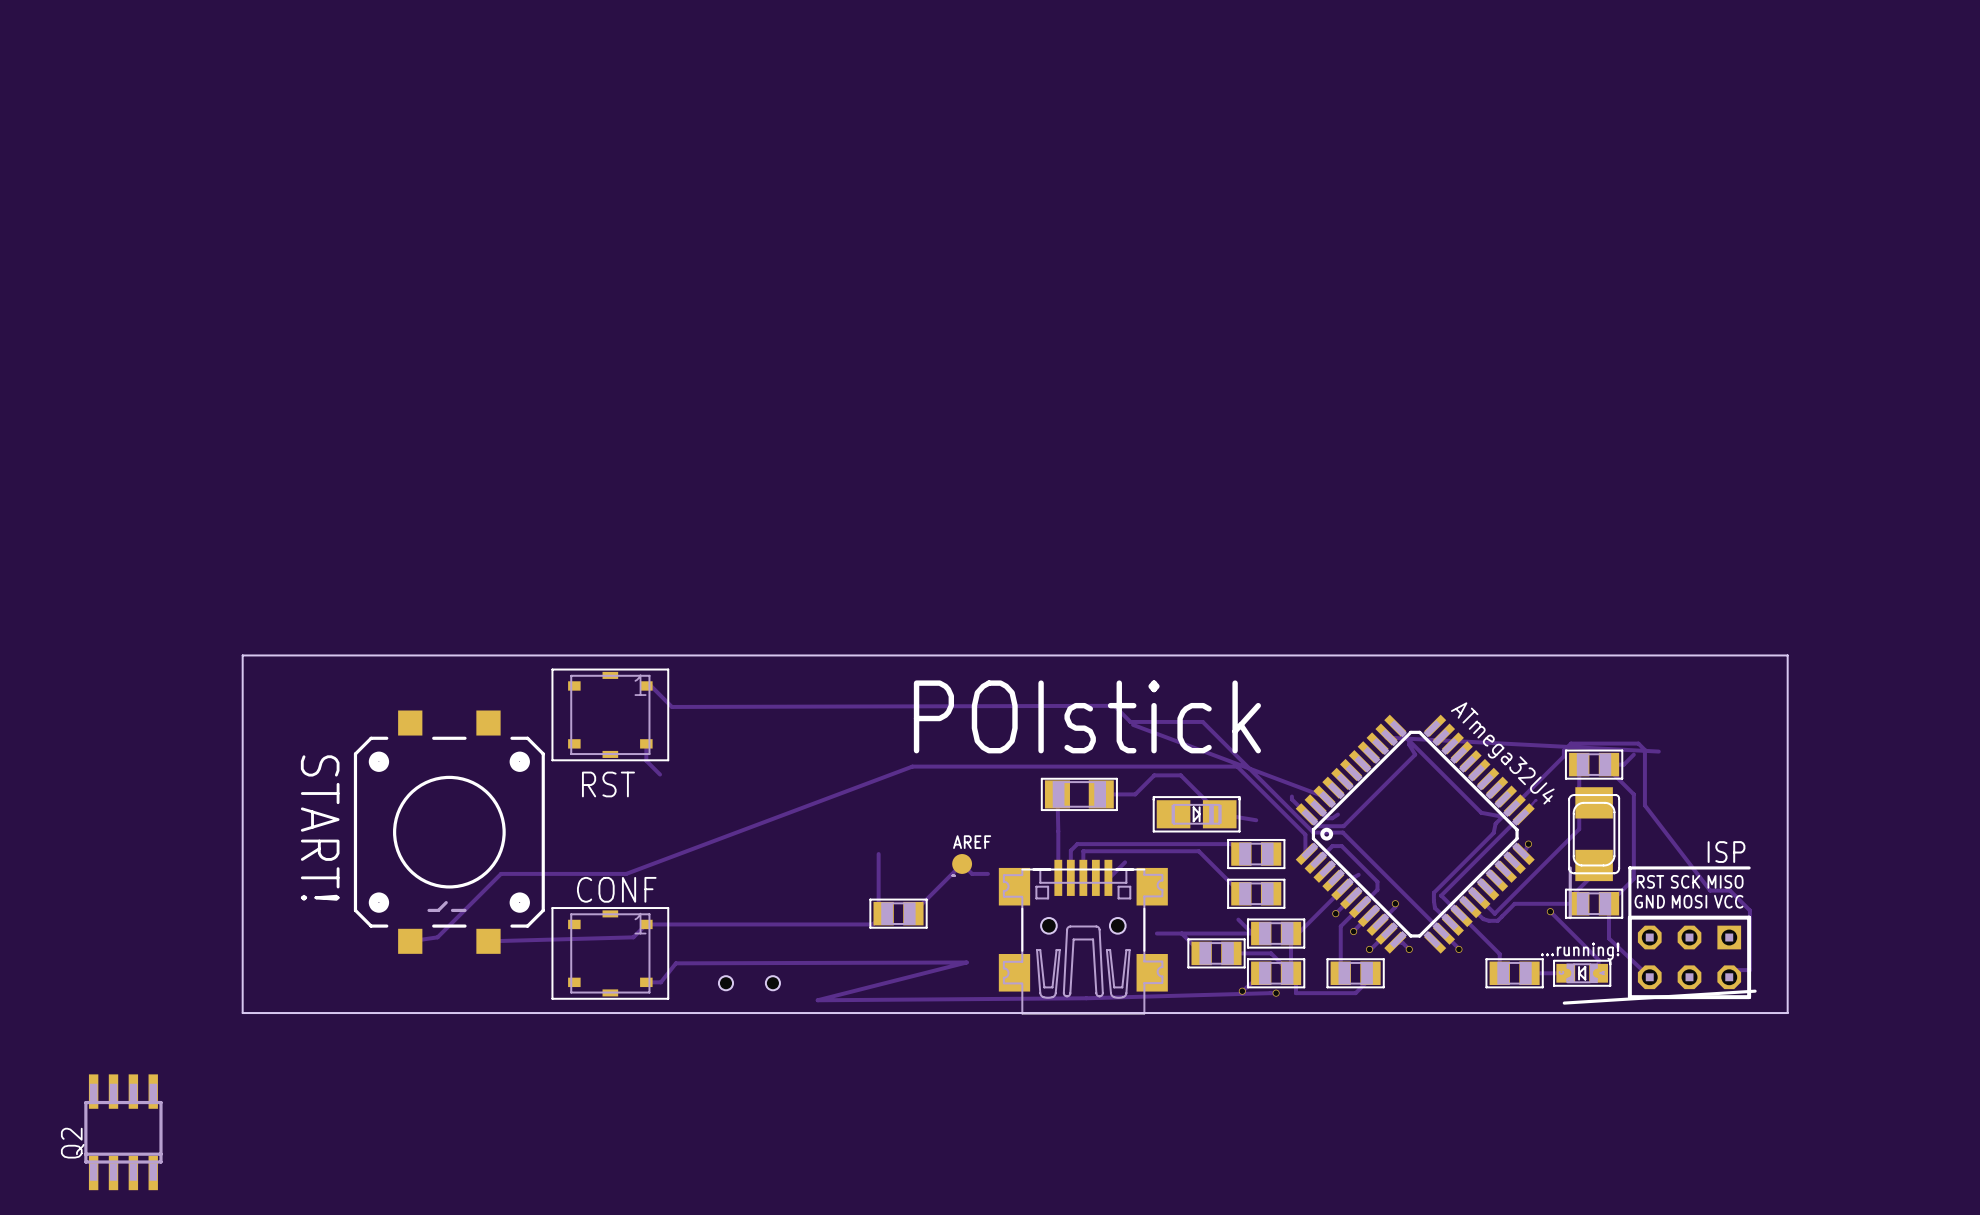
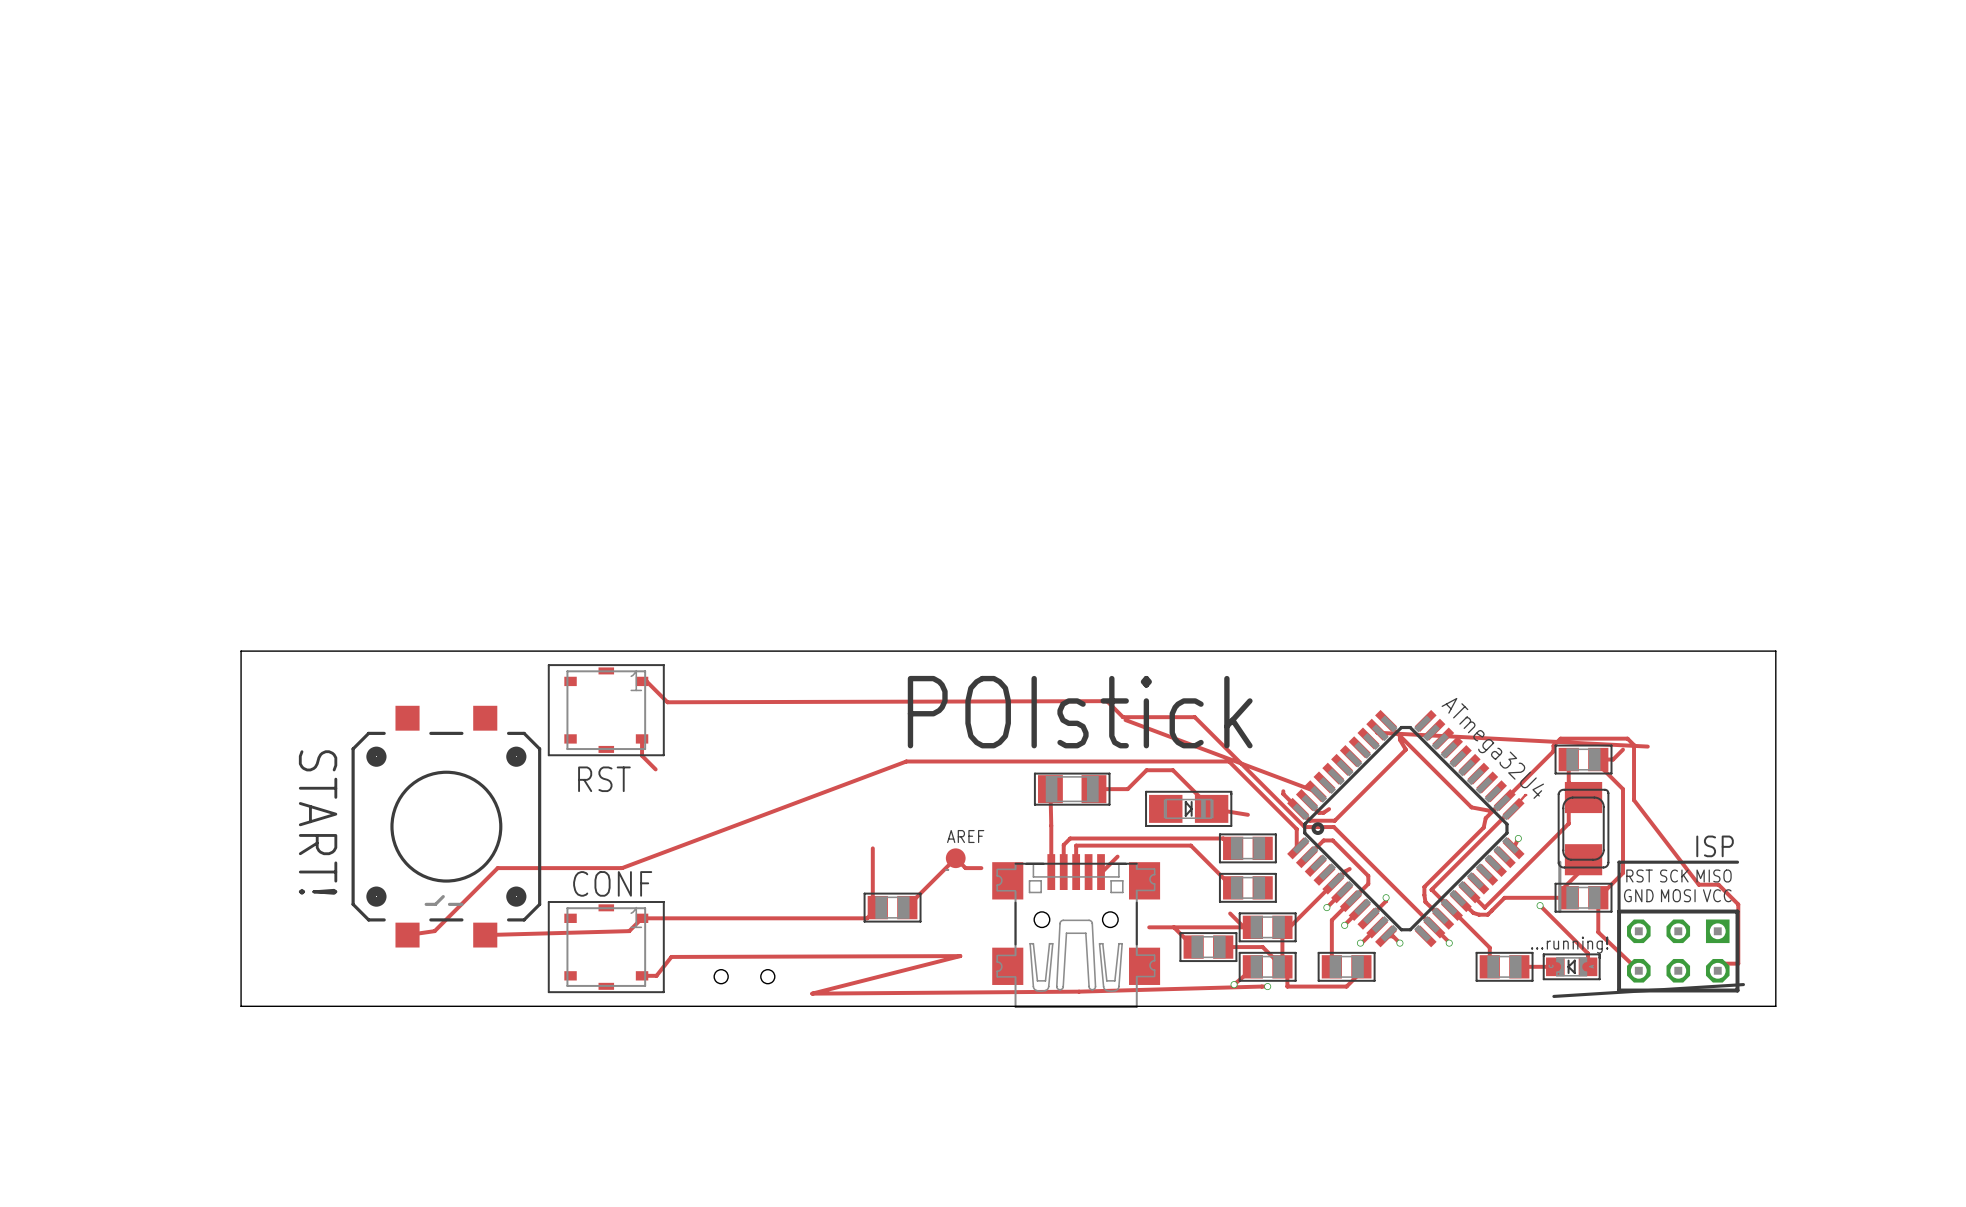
Q2: (123, 1132) -> none

